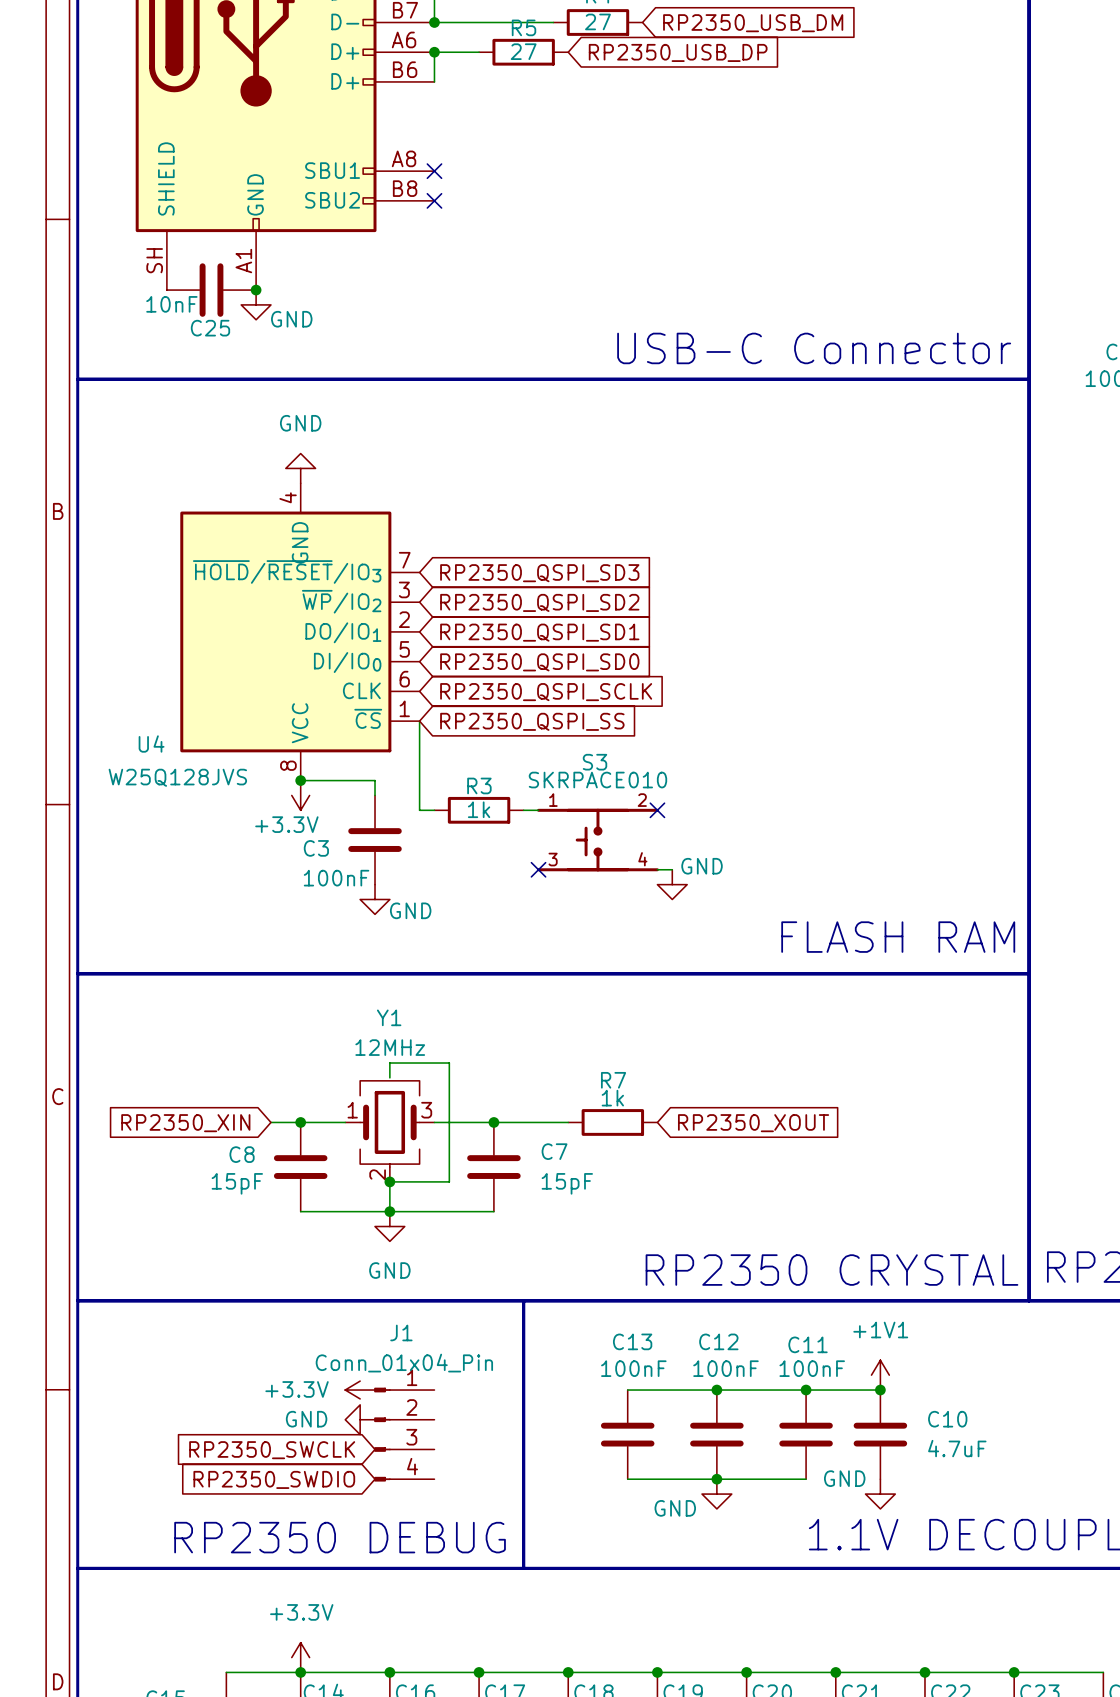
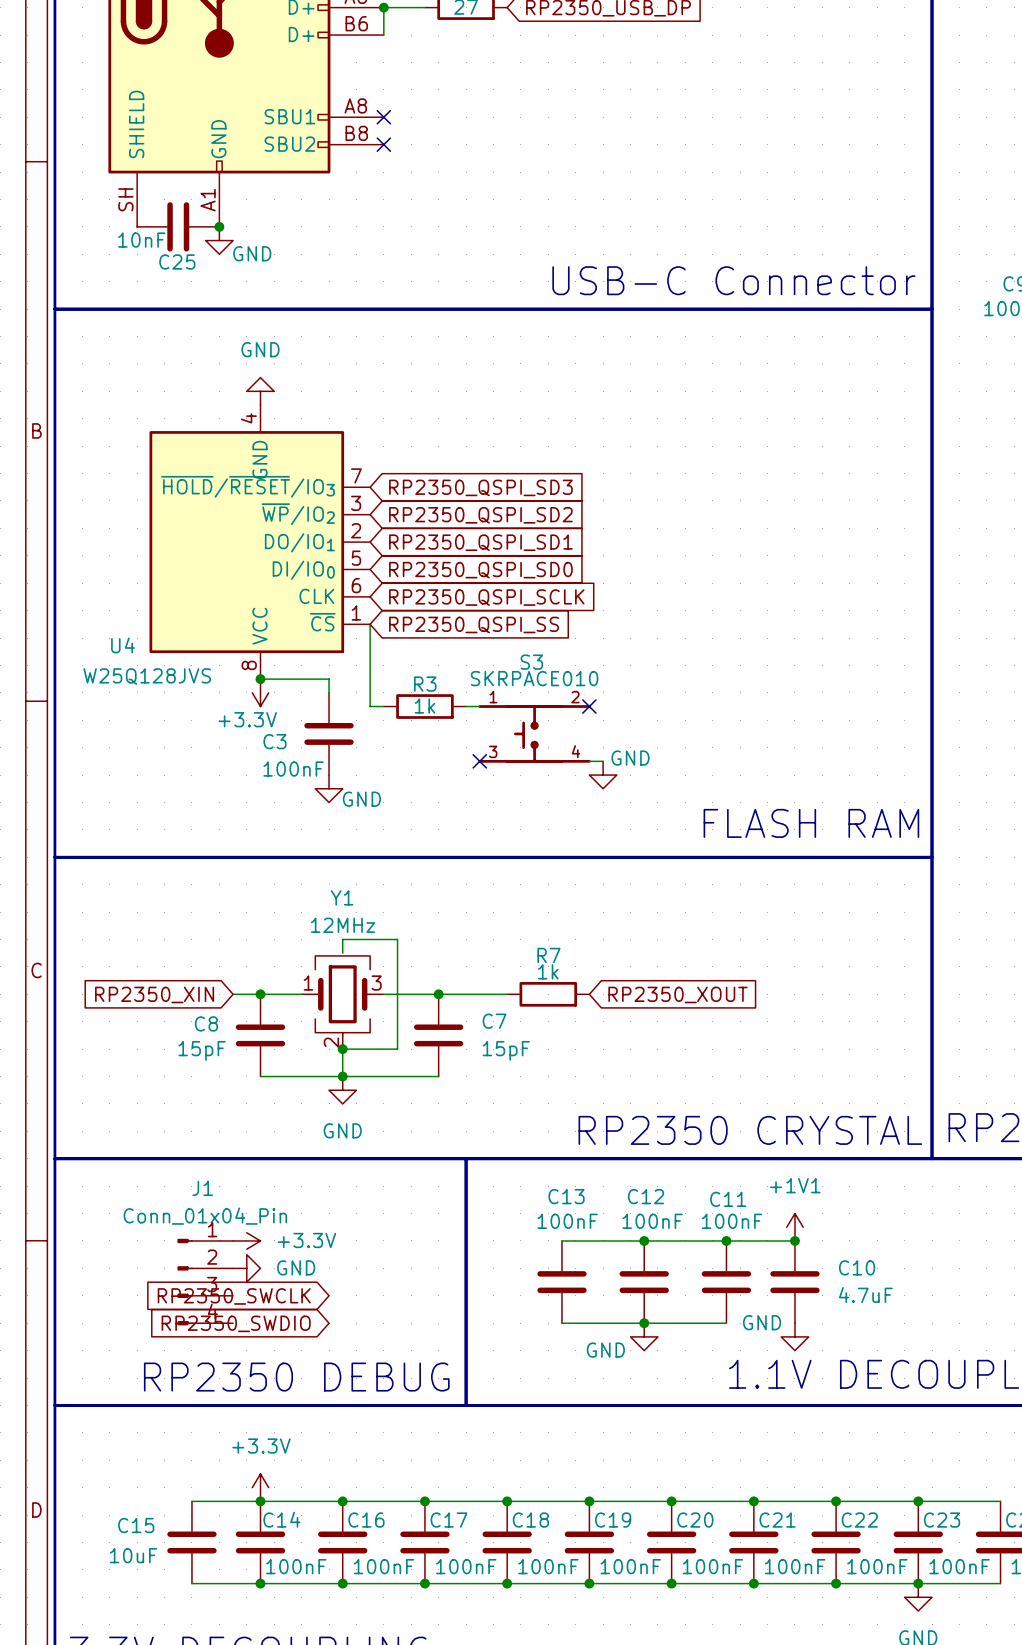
power symbol rotation: 0° (360, 1390) -> 180° (246, 1240)
power symbol position: +3.3V (360, 1390) -> +3.3V (246, 1240)
power symbol rotation: 0° (360, 1419) -> 180° (246, 1268)
power symbol position: GND (360, 1419) -> GND (246, 1268)
J1 position: (404, 1434) -> (205, 1282)

